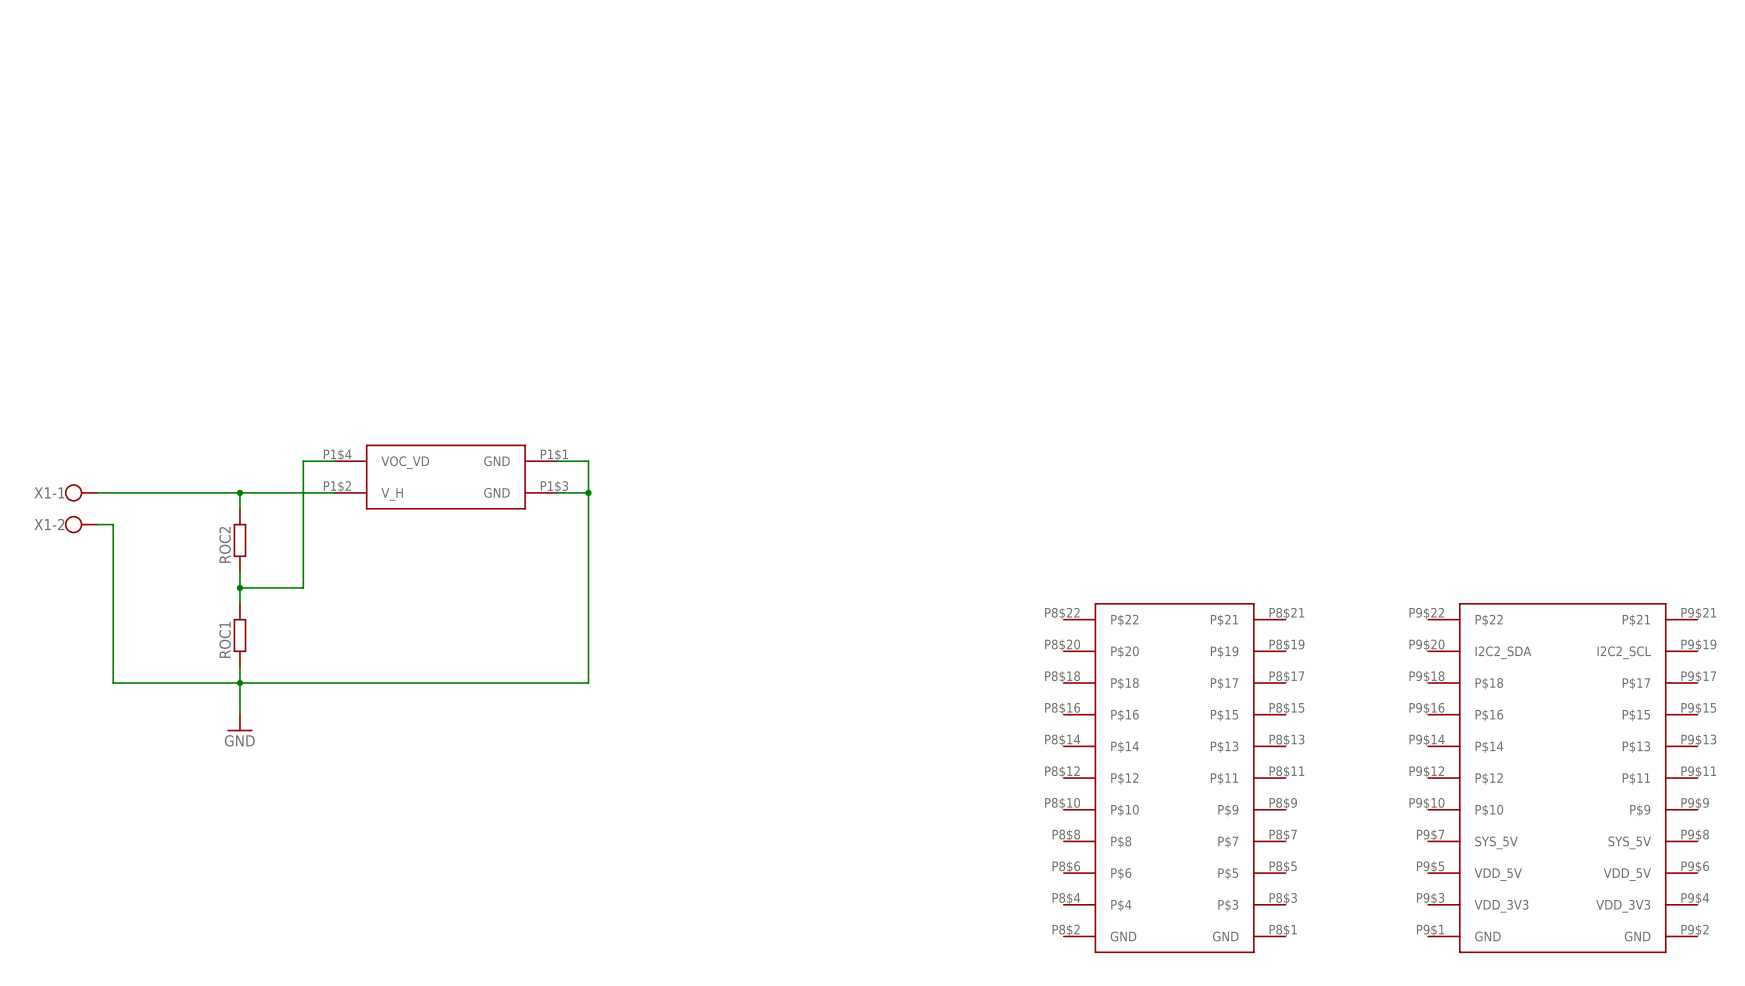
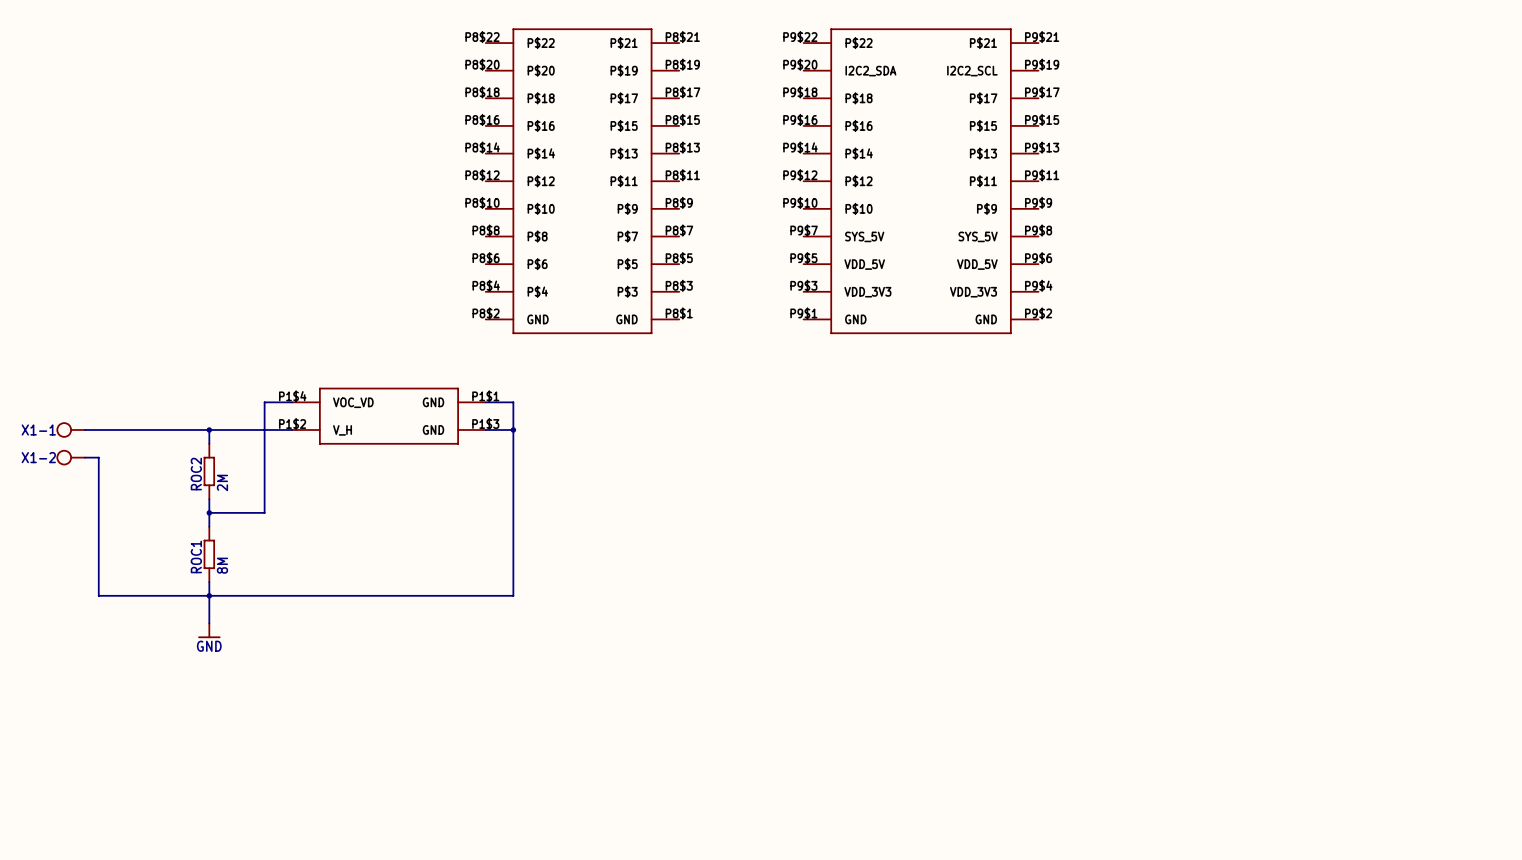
part: none -> (582, 181)
part: none -> (921, 181)
ROC2 value: none -> 2M (222, 482)
ROC1 value: none -> 8M (222, 565)
part: (1174, 778) -> none
part: (1562, 778) -> none

